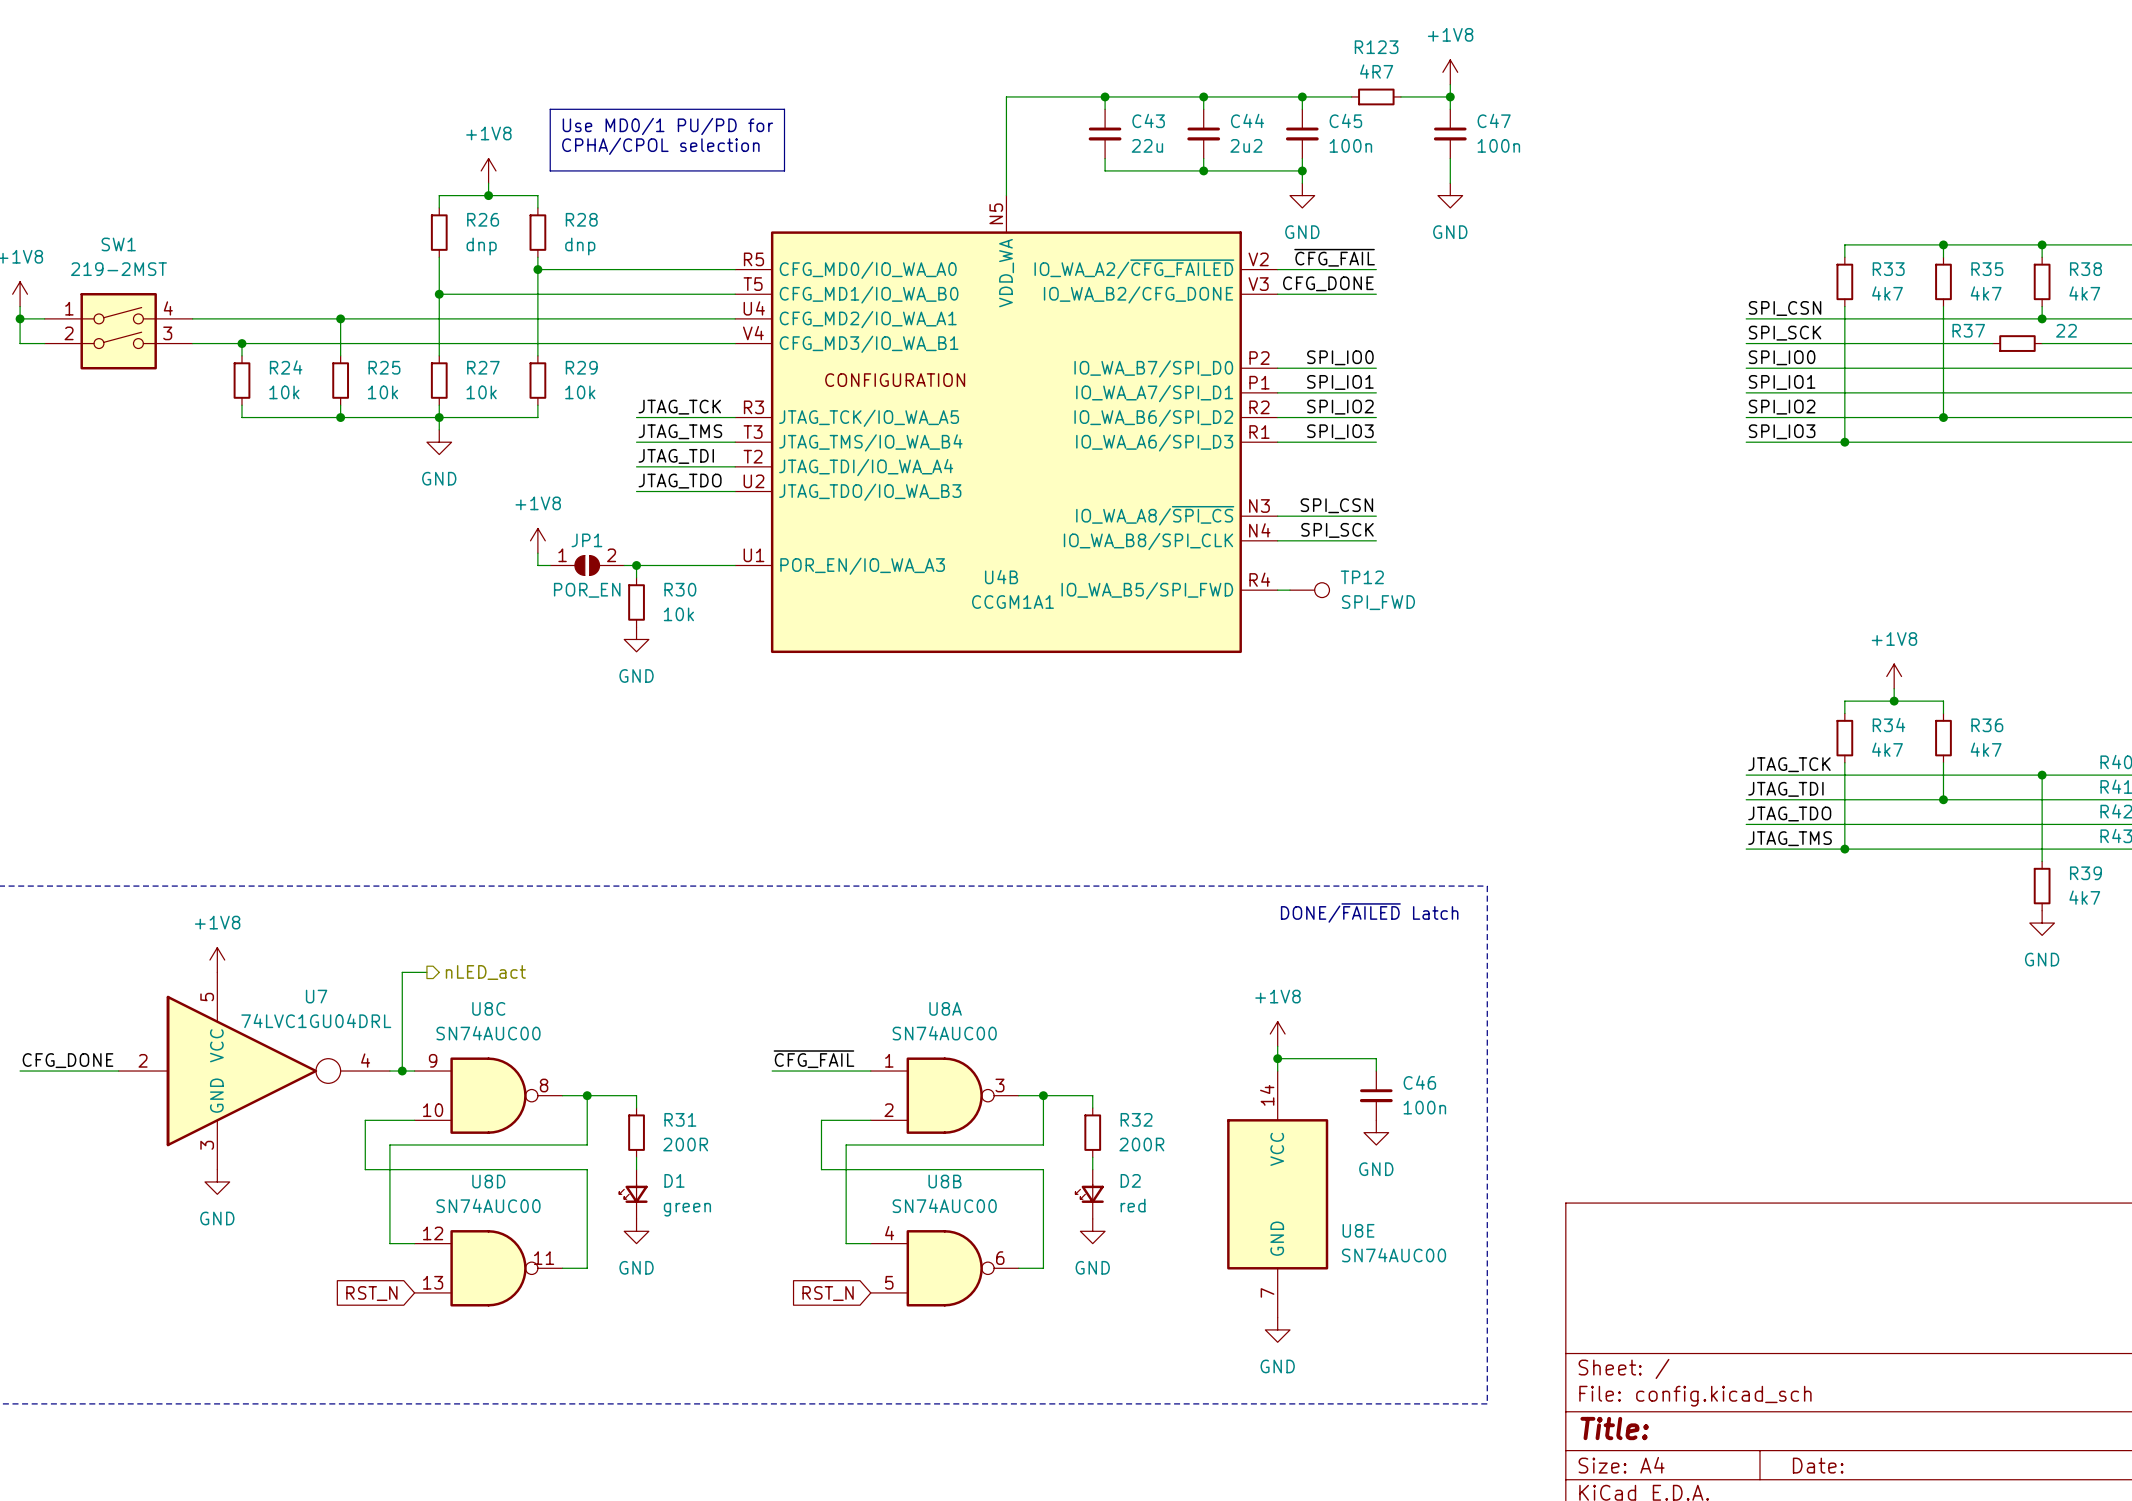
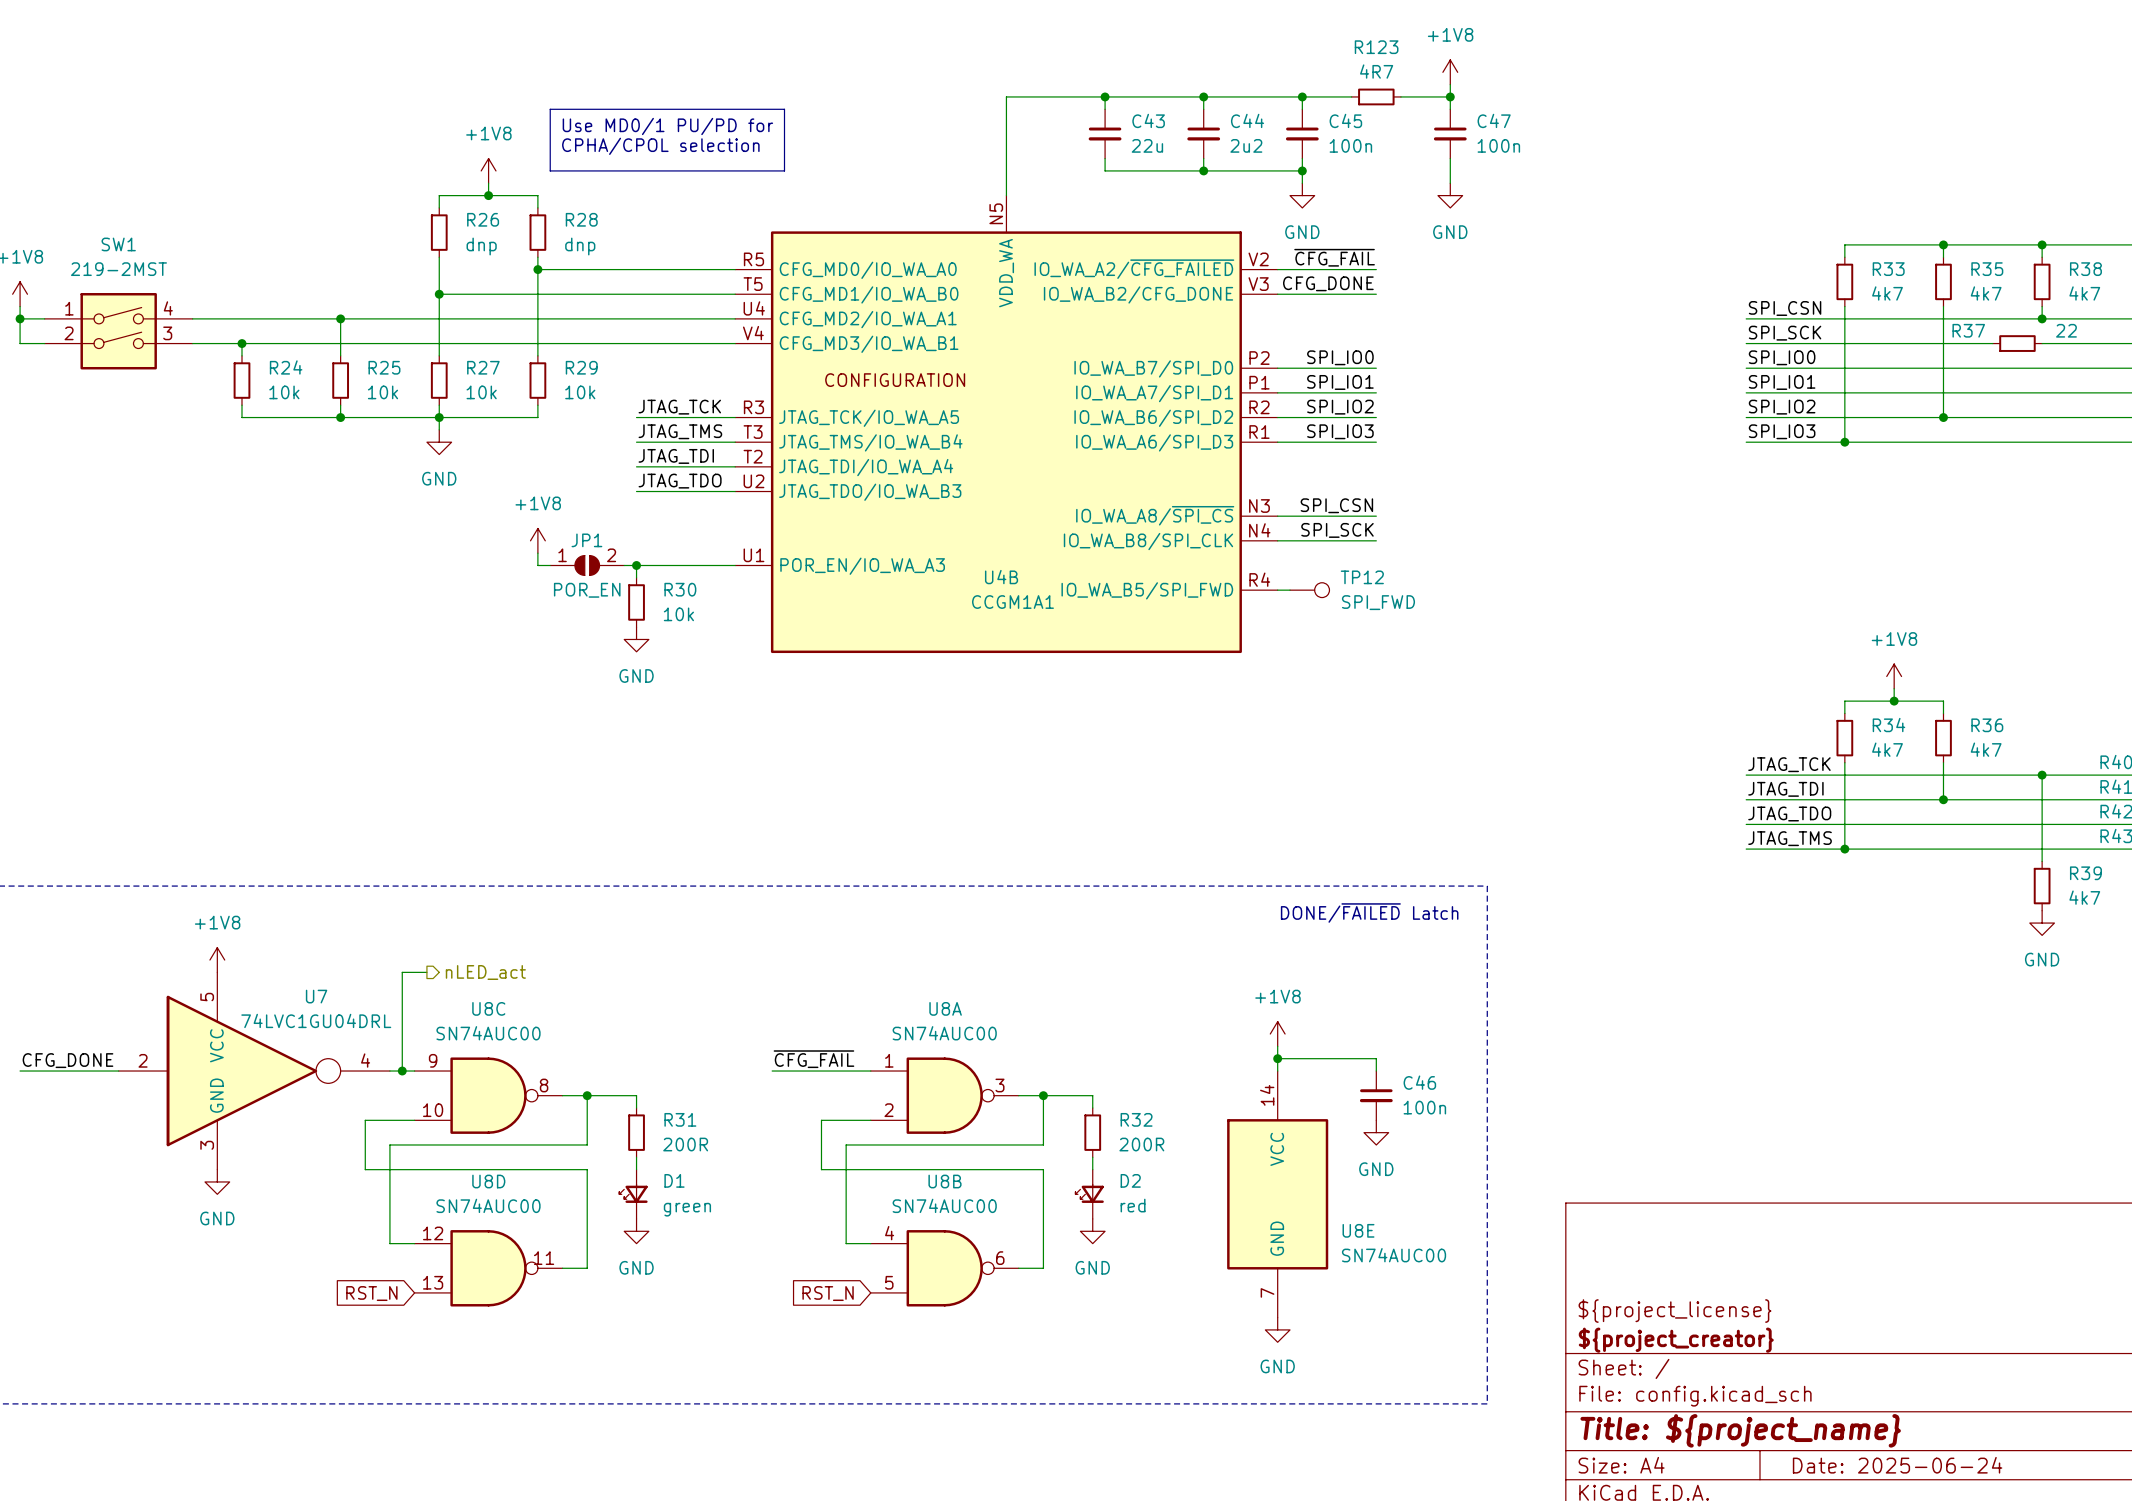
title block: none -> ${project_license} (1674, 1311)
title block: none -> ${project_creator} (1676, 1340)
title block: Title: (1614, 1428) -> Title: ${project_name} (1740, 1430)
title block: Date: (1818, 1465) -> Date: 2025-06-24 (1897, 1465)

